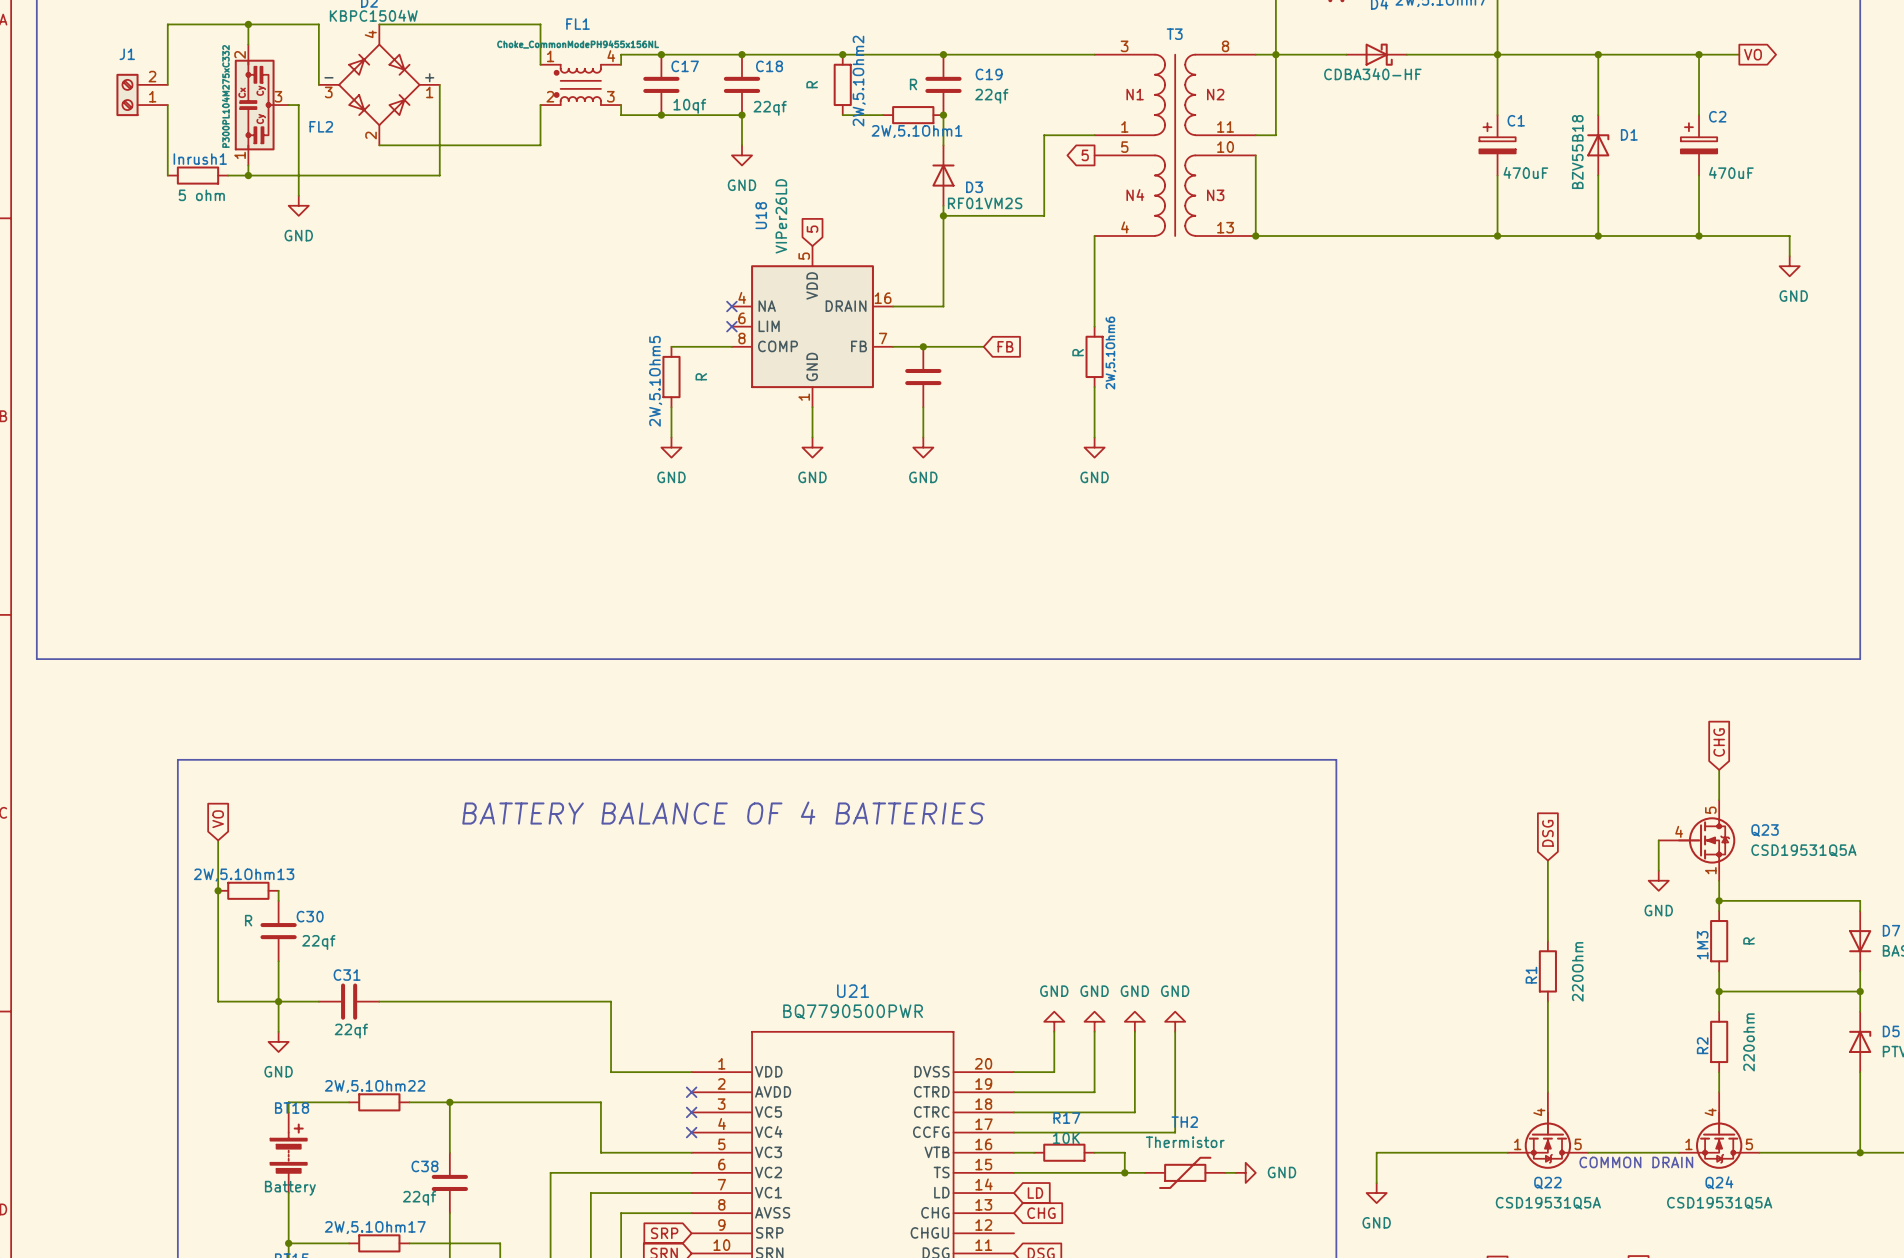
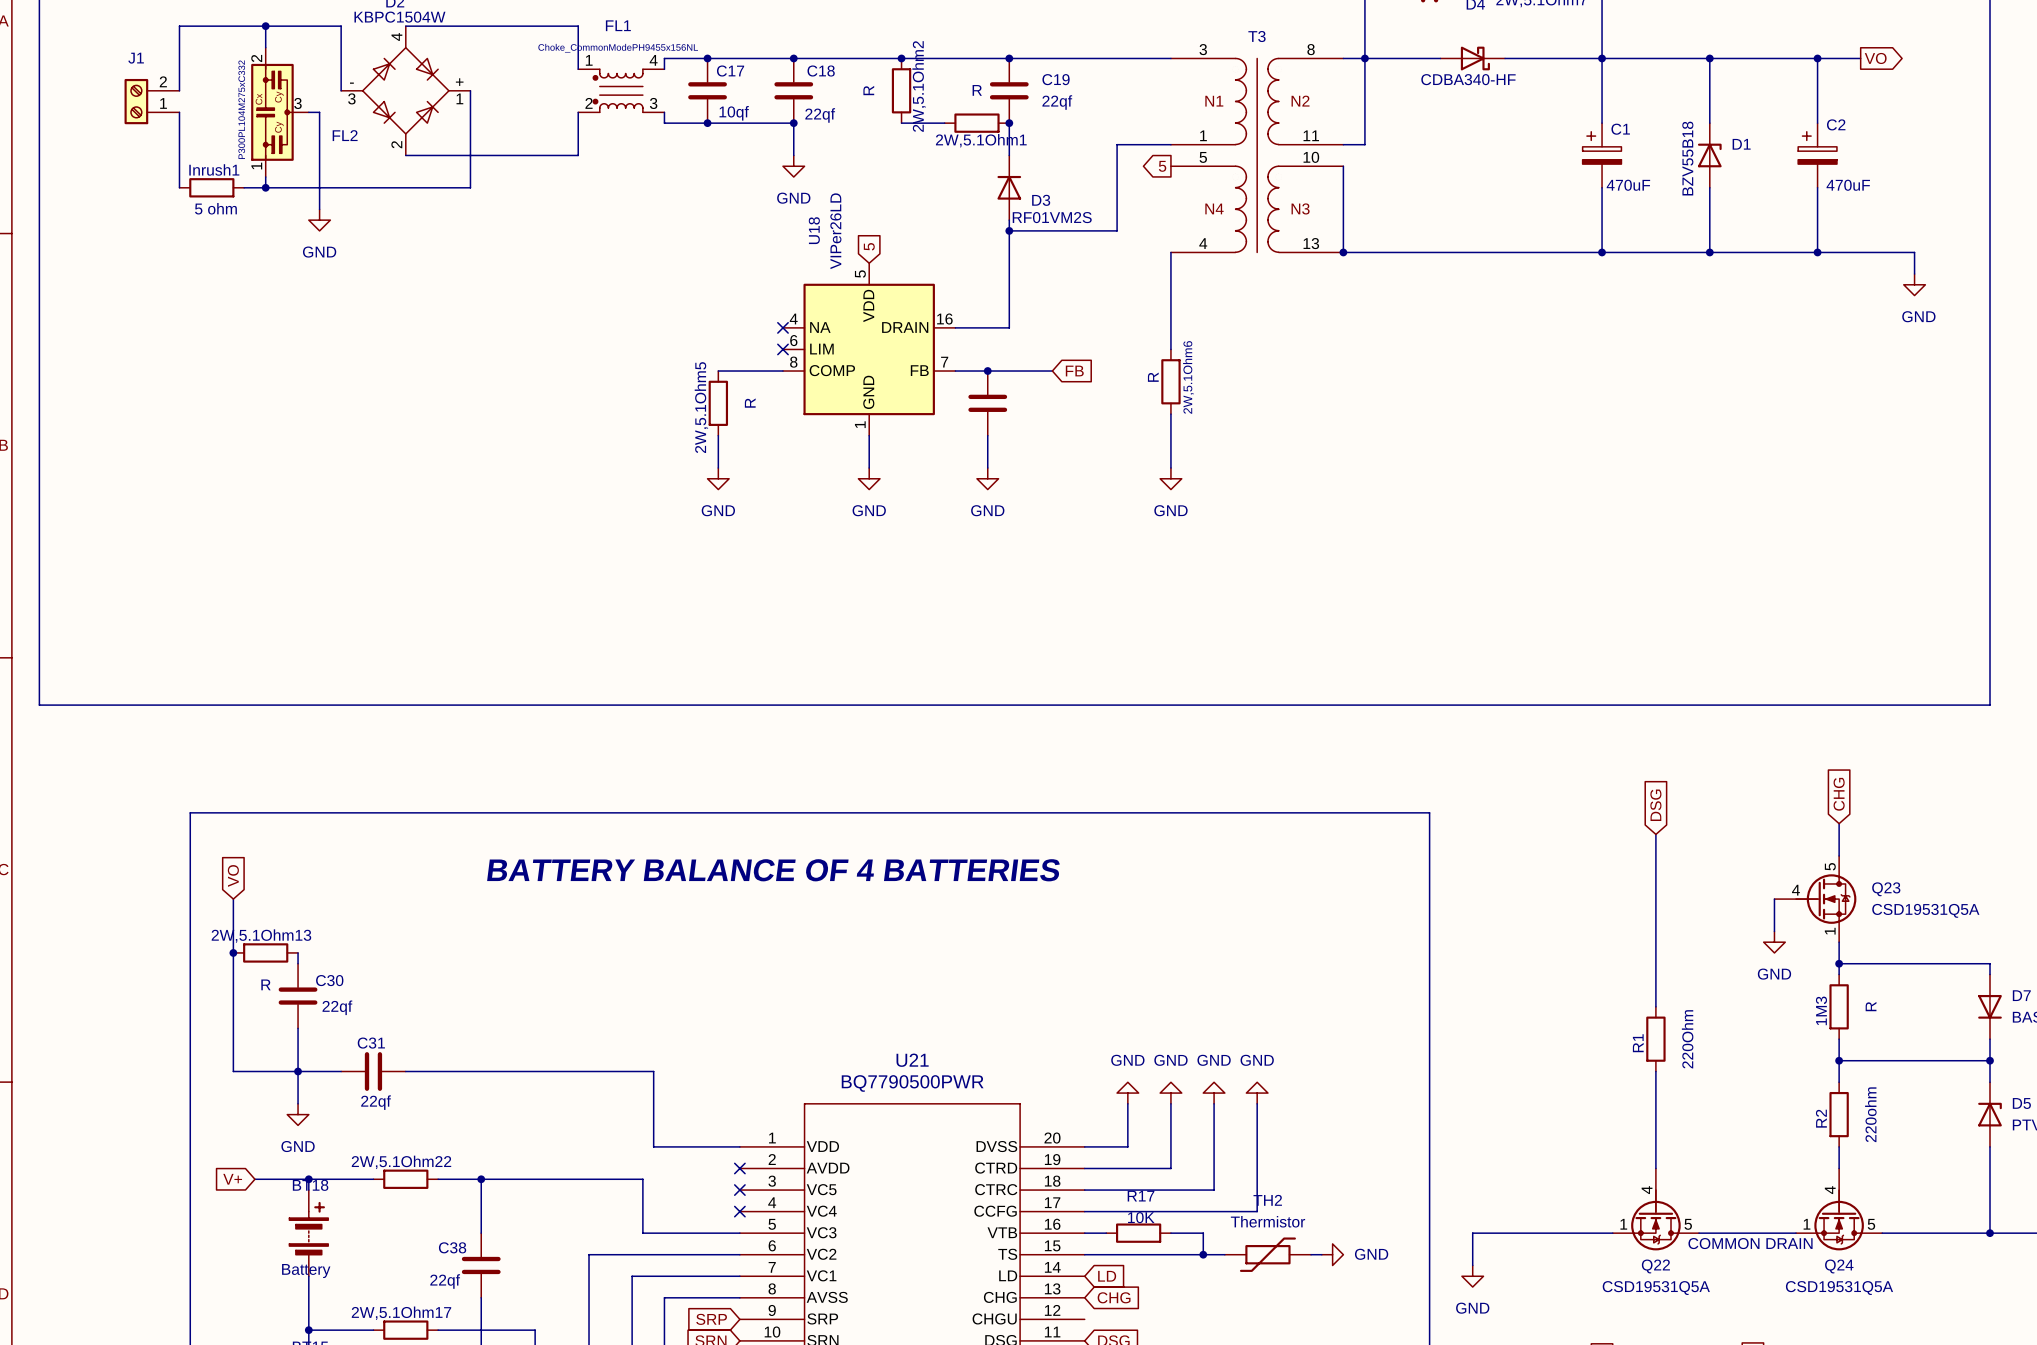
wire: none -> (1655, 834) (1655, 920)
global label position: DSG (1547, 833) -> DSG (1655, 805)
global label: none -> V+ (232, 1179)
wire: none -> (254, 1179) (308, 1179)
junction: none -> (308, 1179)

